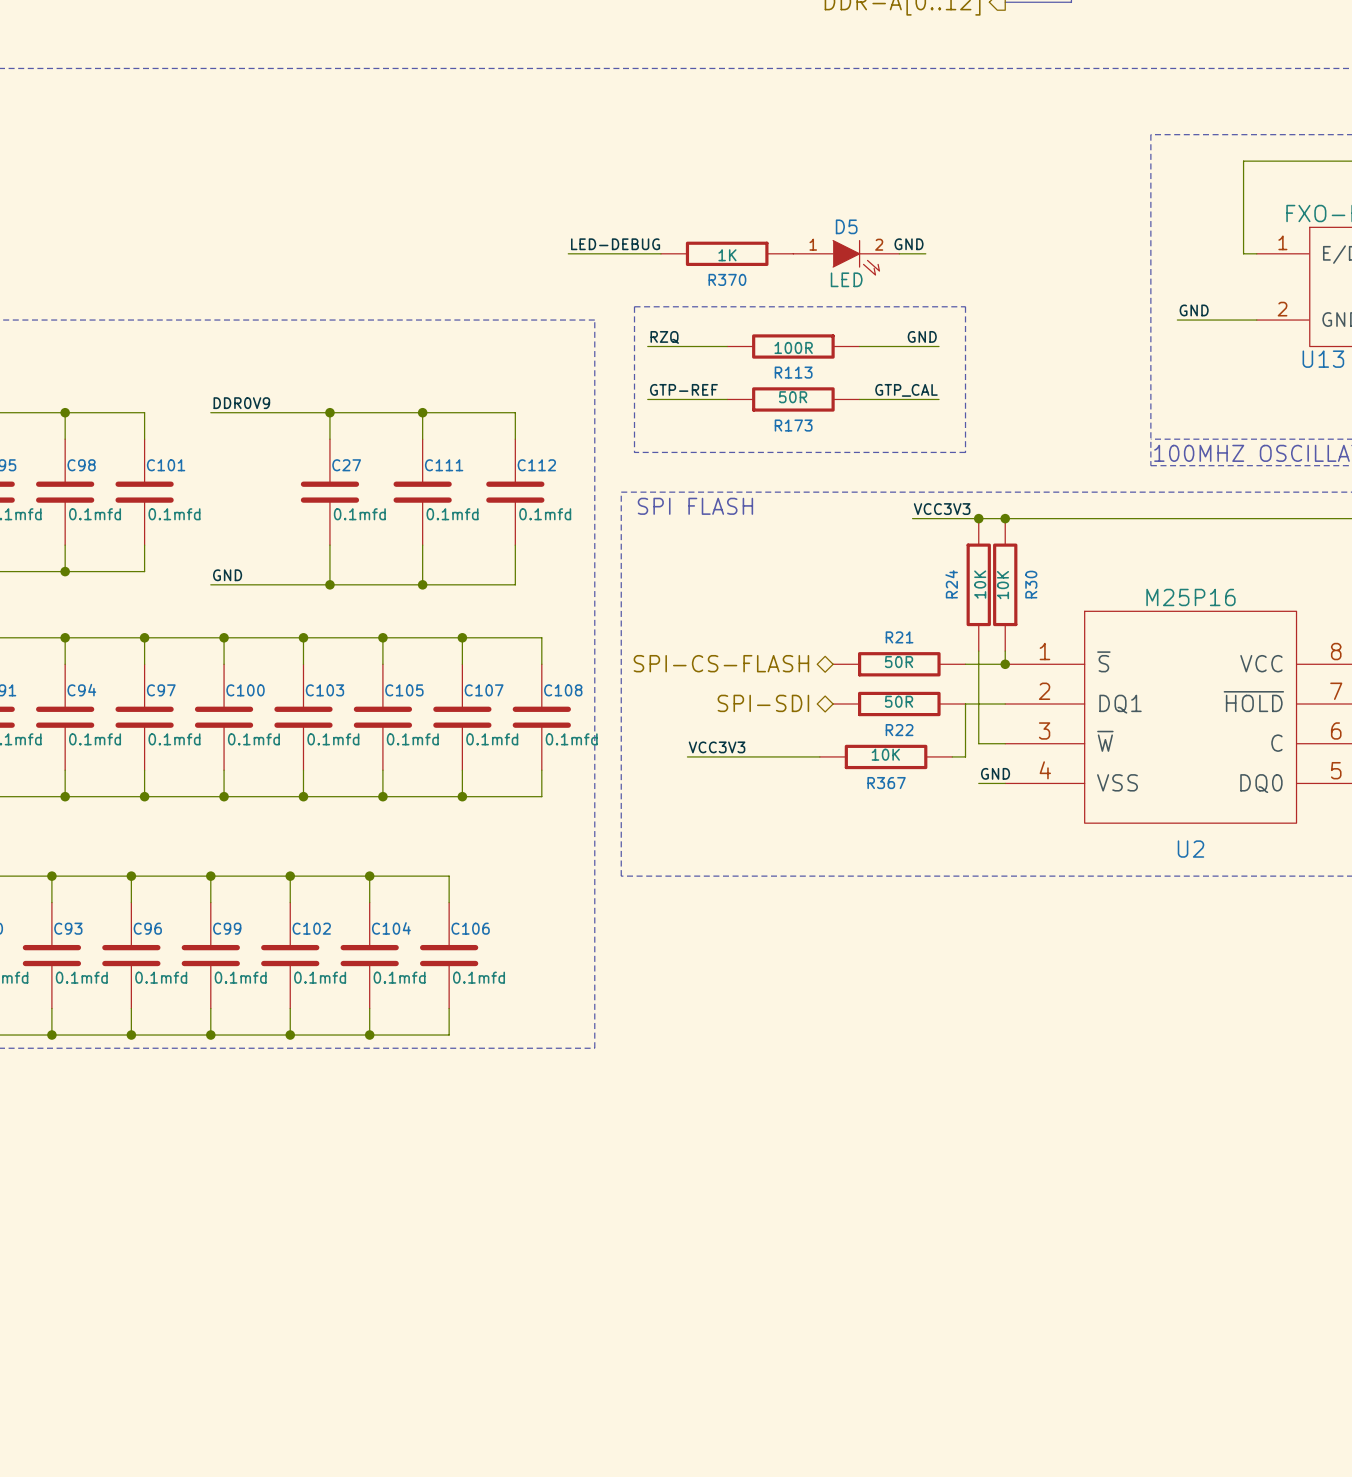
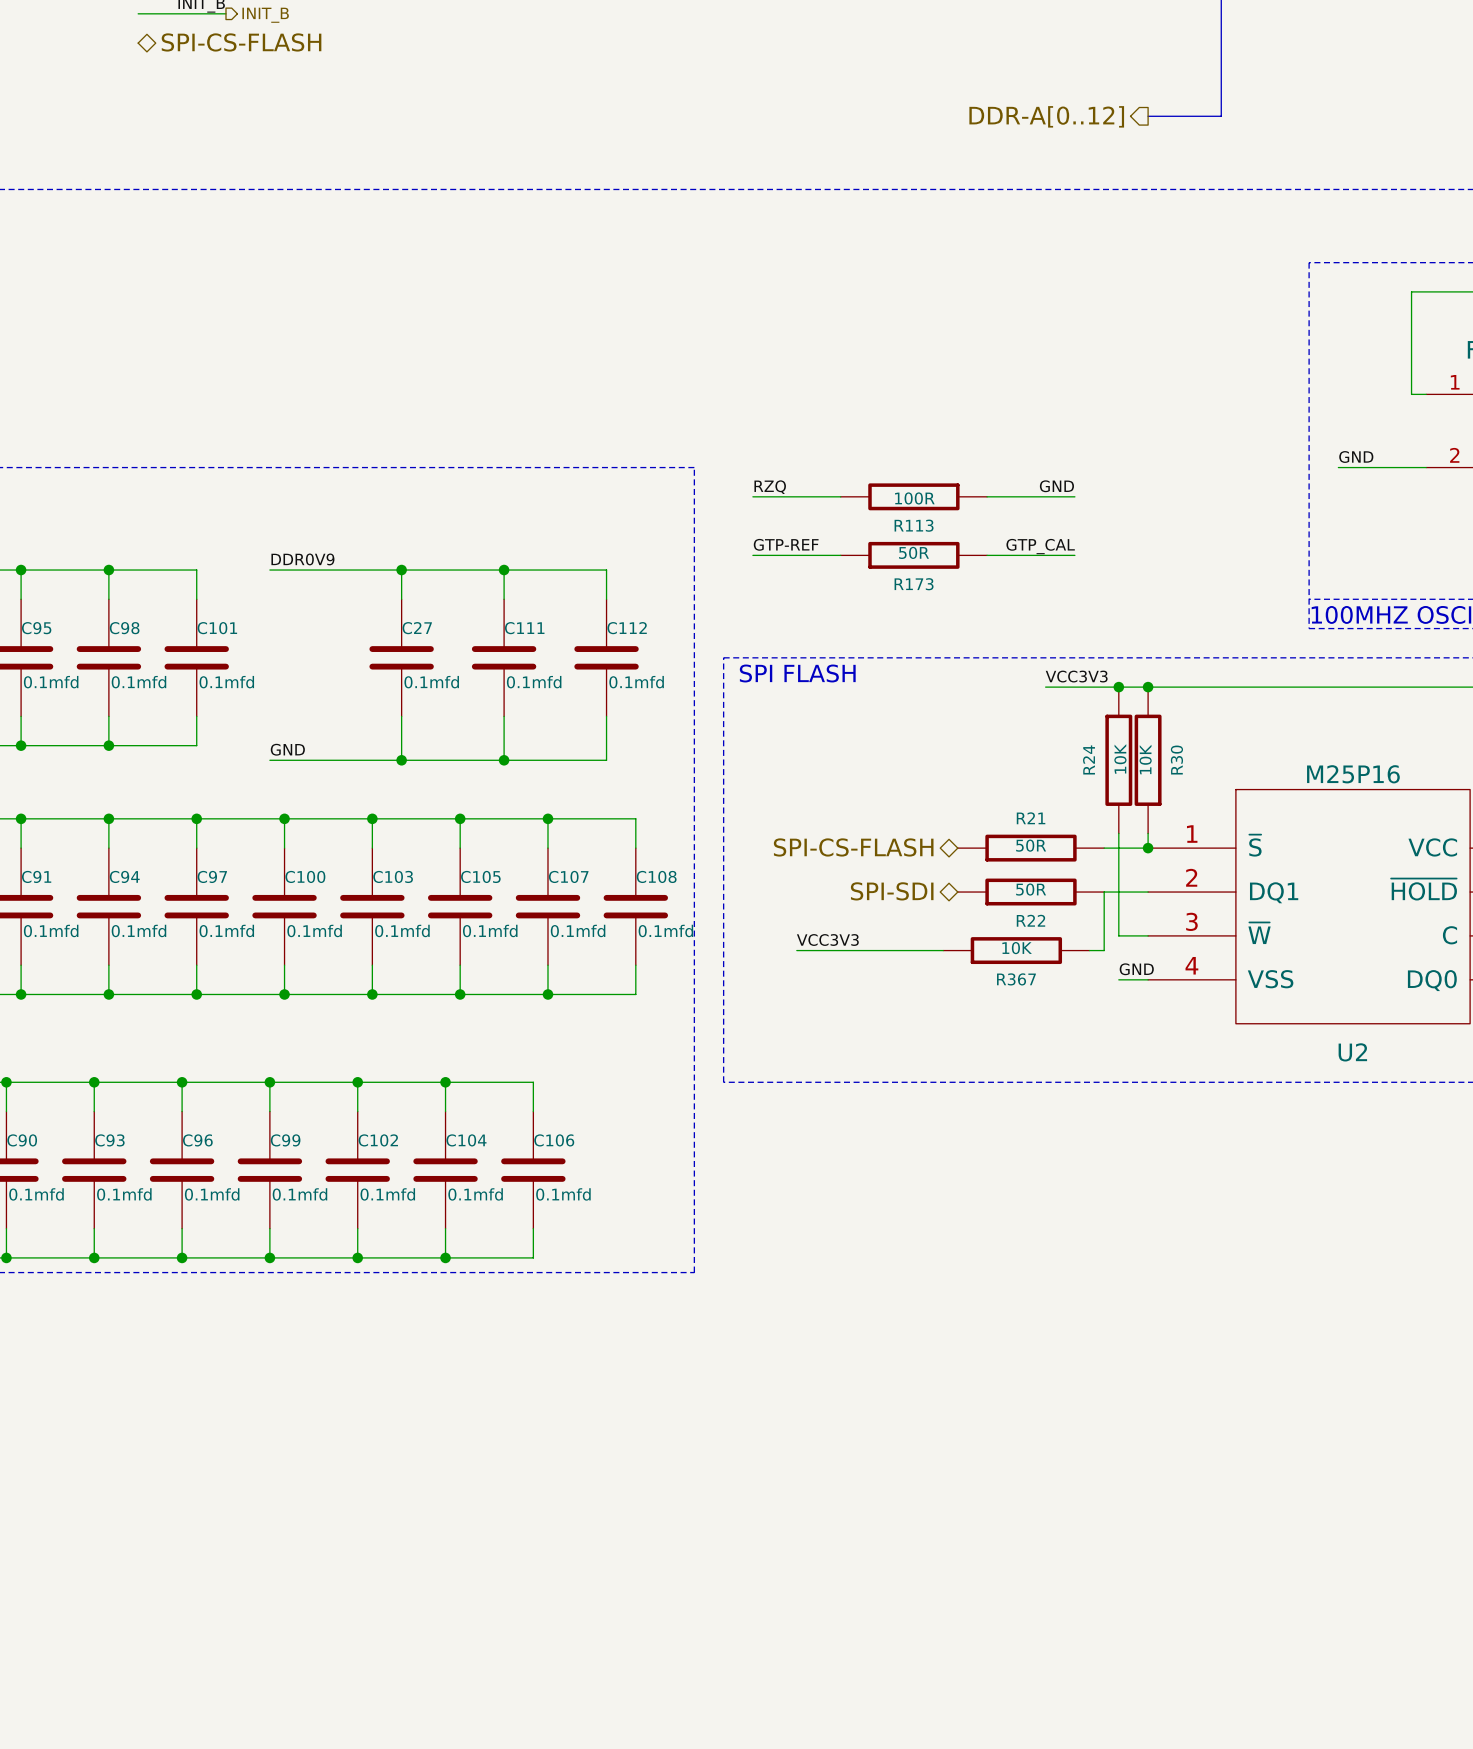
label: LED-DEBUG (615, 244) -> none
label: GND (909, 244) -> none
wire: (568, 253) (660, 253) -> none
R370: 1K (727, 253) -> none
wire: (899, 253) (925, 253) -> none
D5: LED (846, 257) -> none
line: (634, 306) (634, 452) (965, 452) (965, 306) (634, 306) -> none

